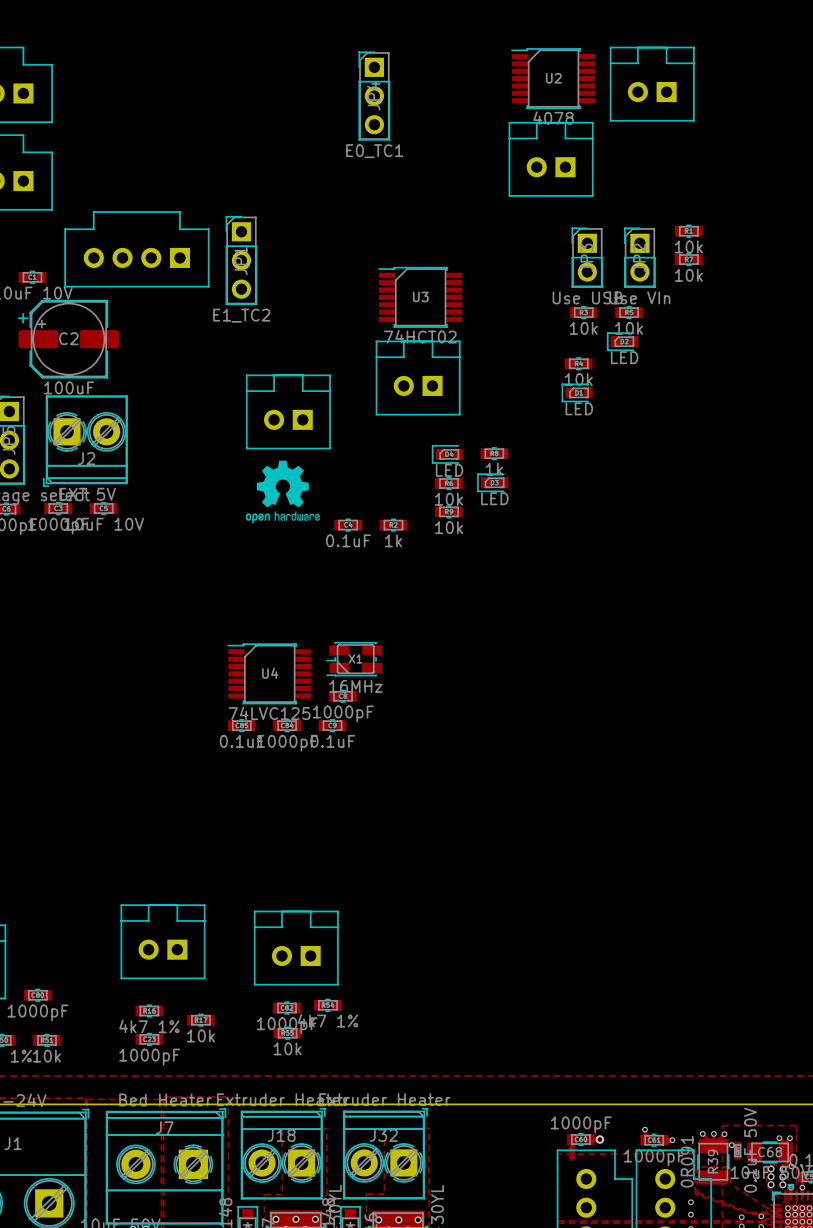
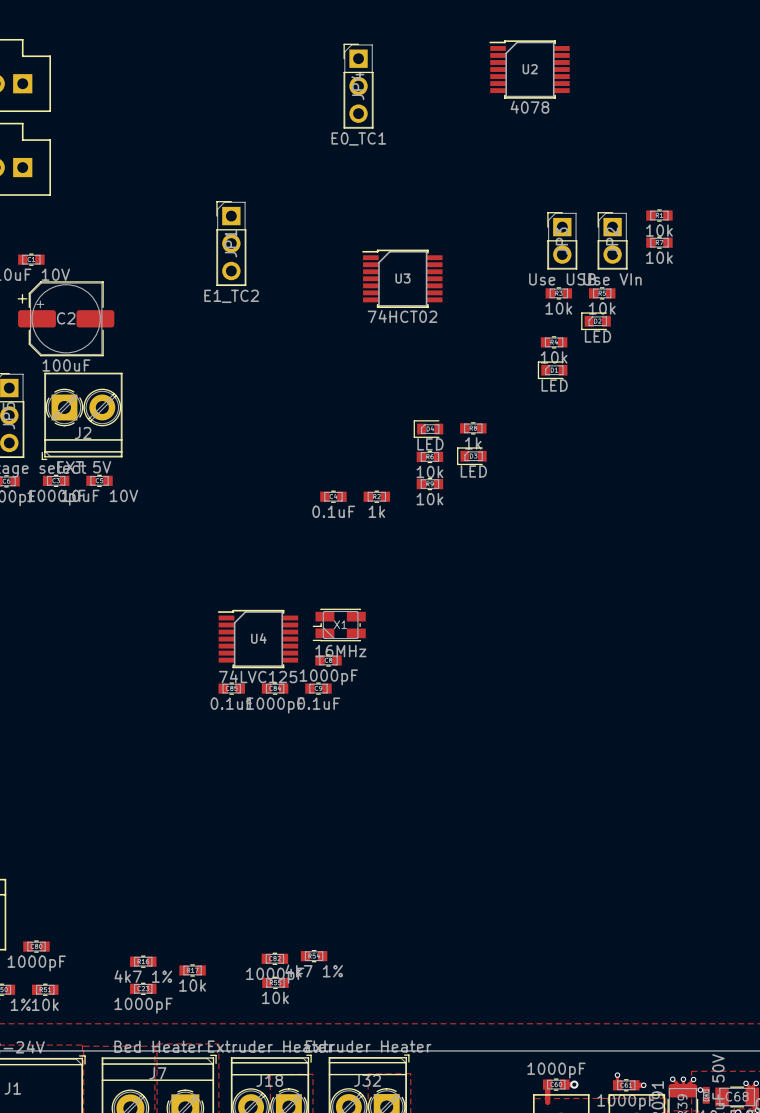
part: (652, 84) -> none
part: (551, 159) -> none
part: (136, 249) -> none
part: (418, 378) -> none
part: (288, 411) -> none
drawing: [245, 460, 320, 524] -> none
part: (163, 941) -> none
part: (296, 948) -> none

